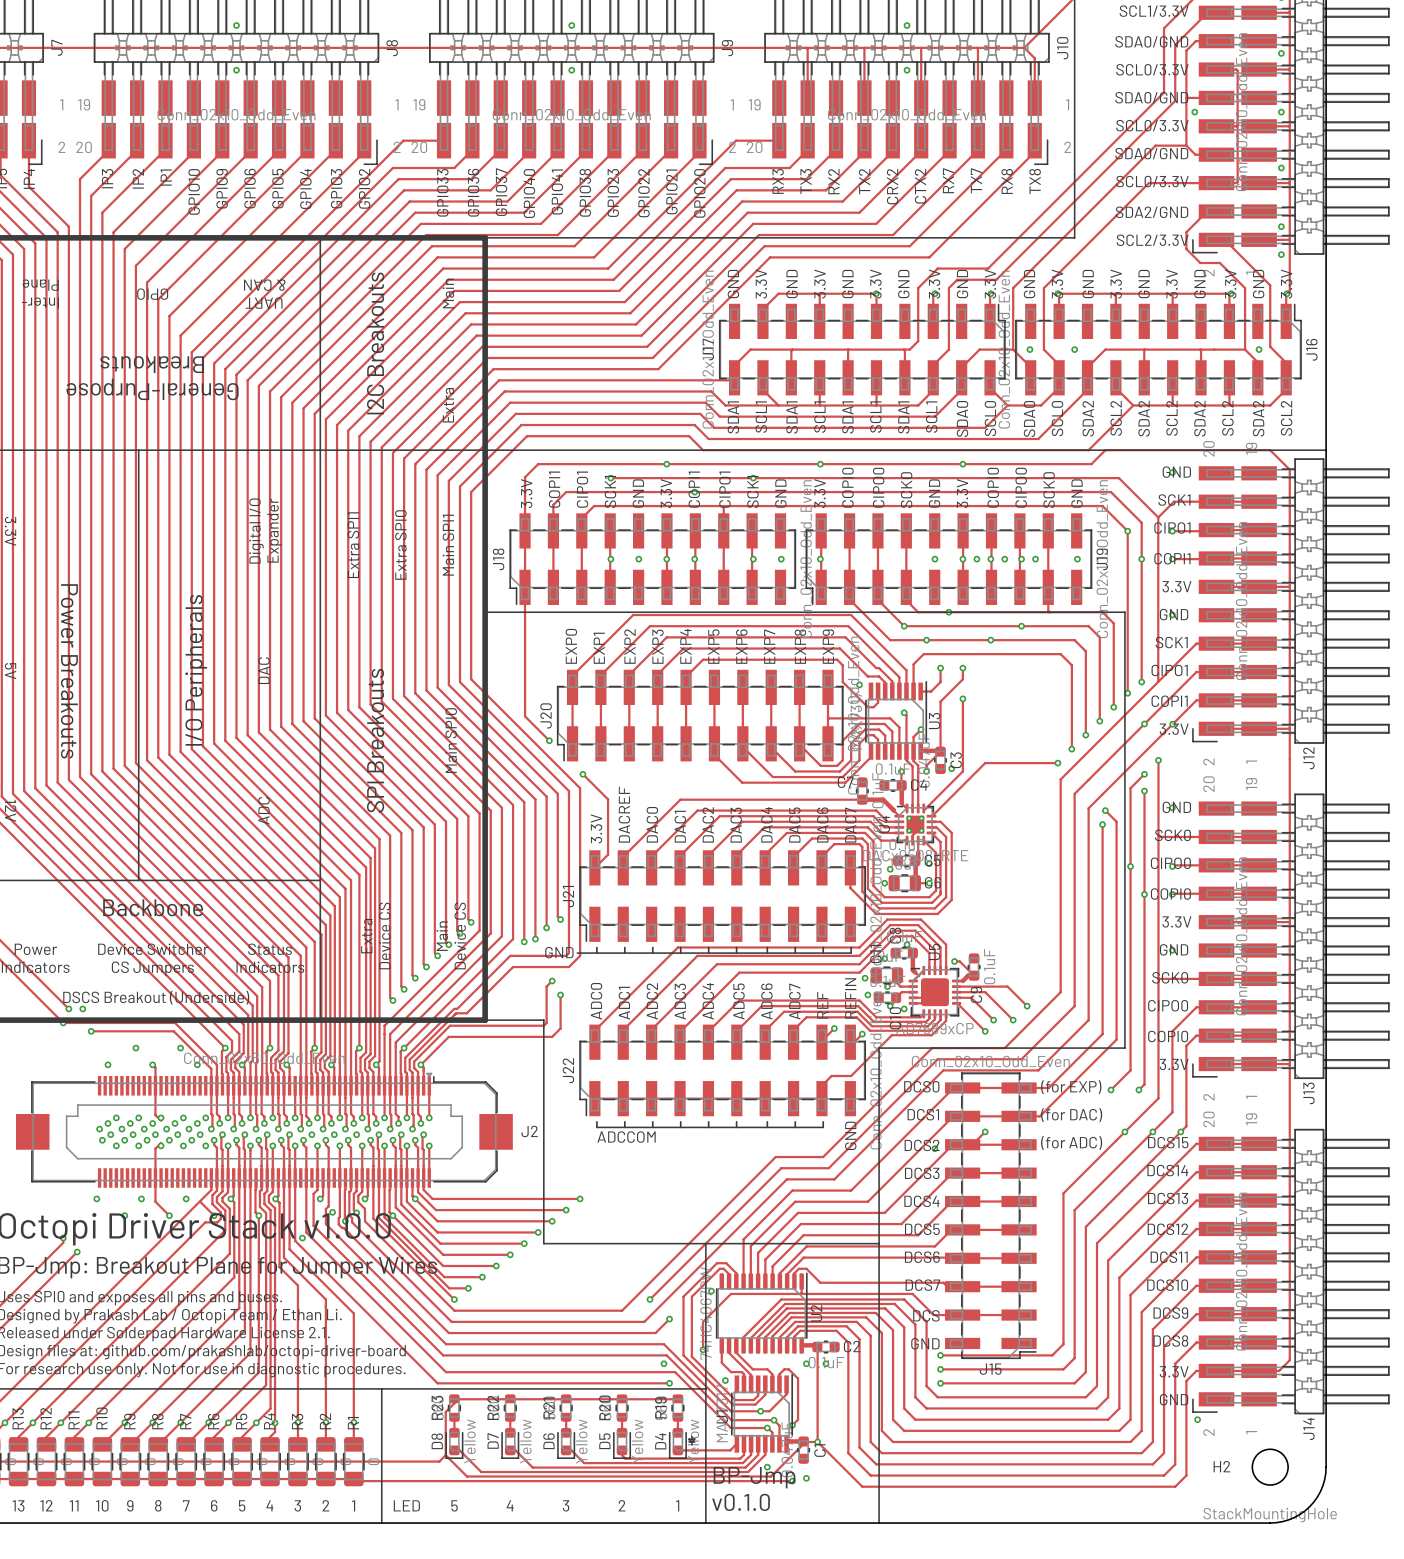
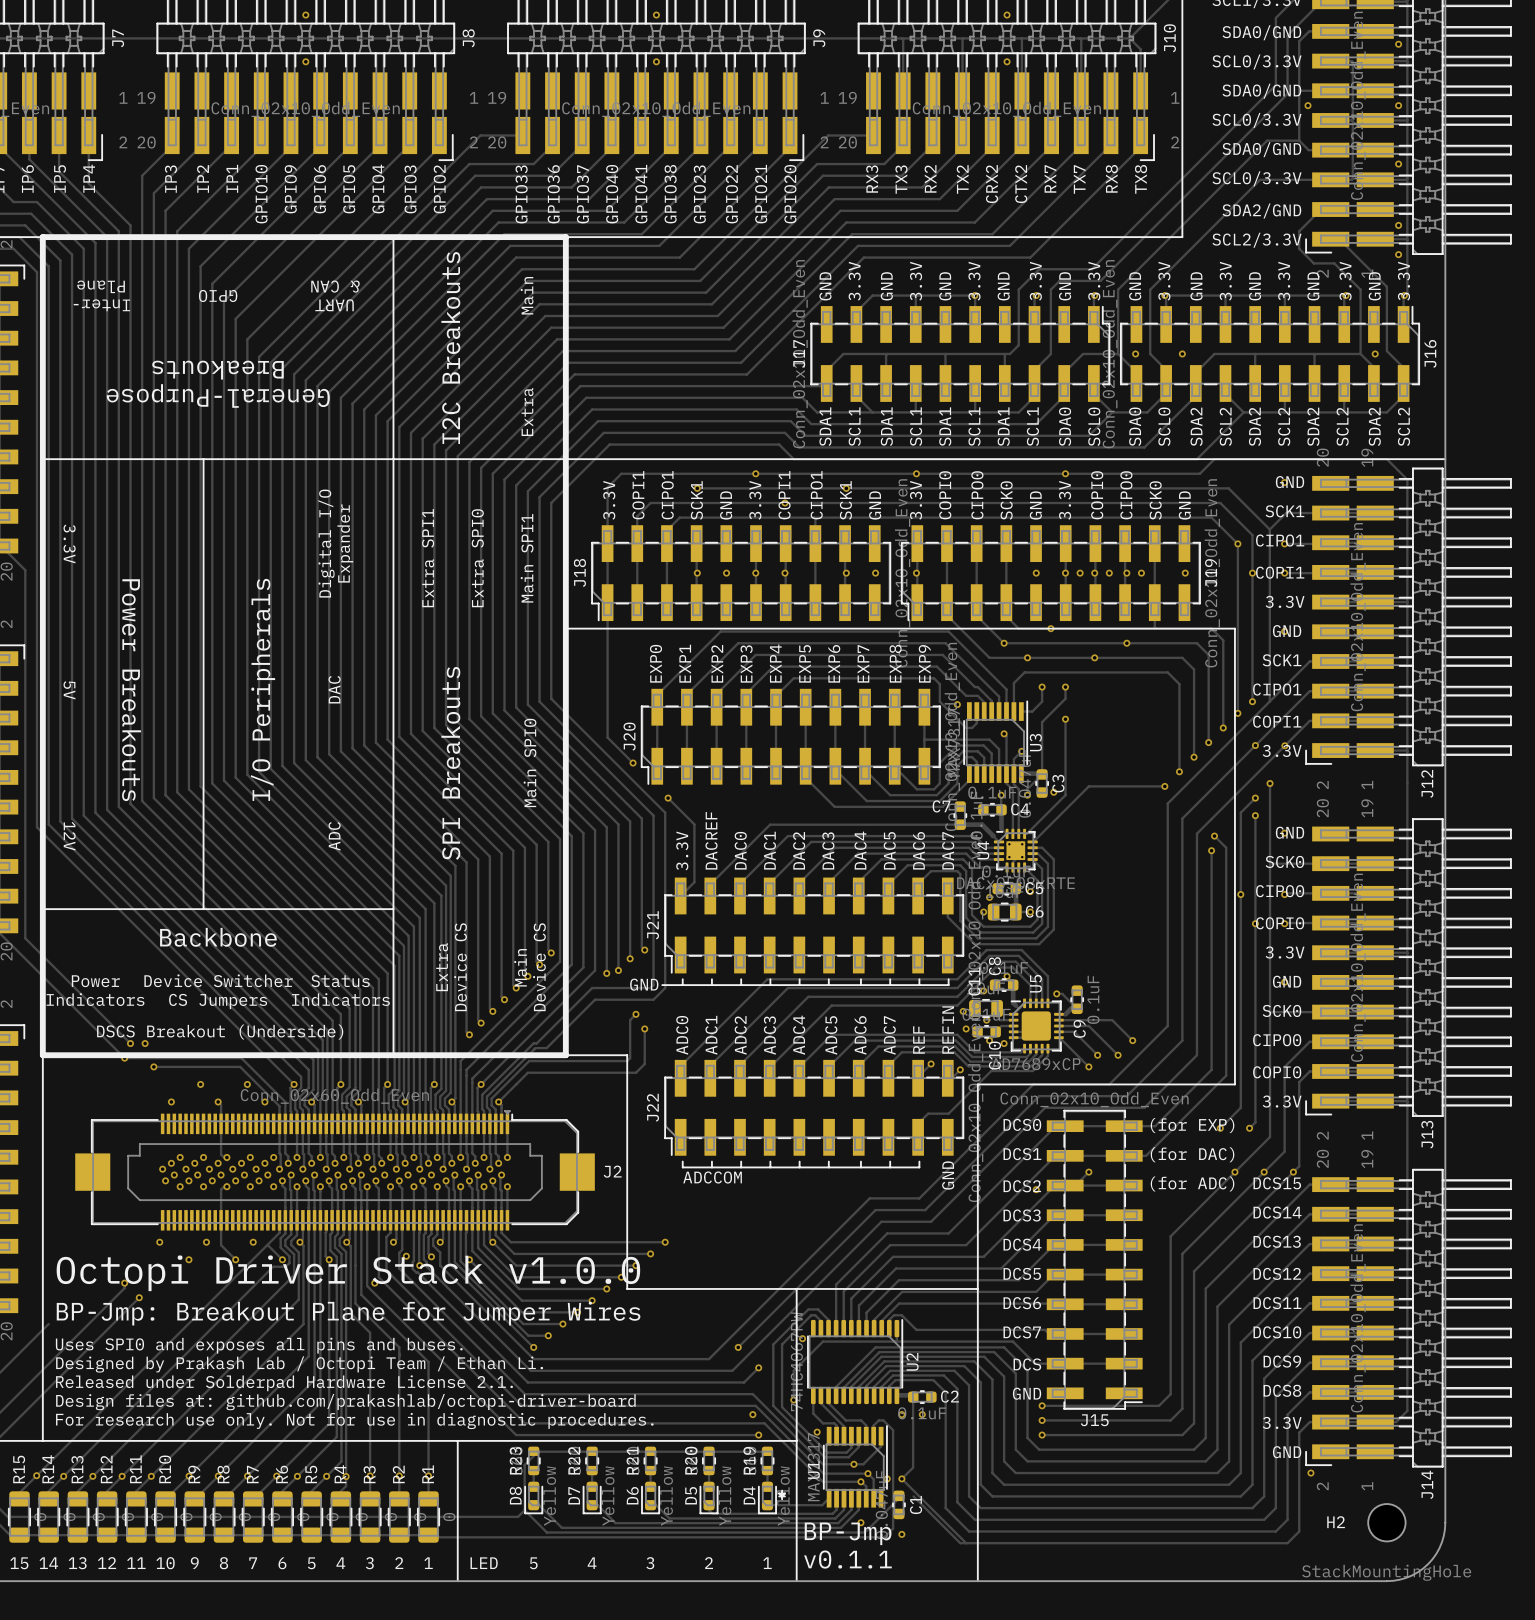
track: (817, 1347) (817, 1442) (788, 1441) (786, 1443) -> (913, 1397) (913, 1467) (901, 1478) (966, 1543)
track: (798, 1419) (792, 1425) -> (893, 1473) (893, 1528) (884, 1537)
via position: (817, 1442) -> (901, 1478)
via: (792, 1481) -> none
text: v0.1.0 (741, 1502) -> v0.1.1 (847, 1559)

